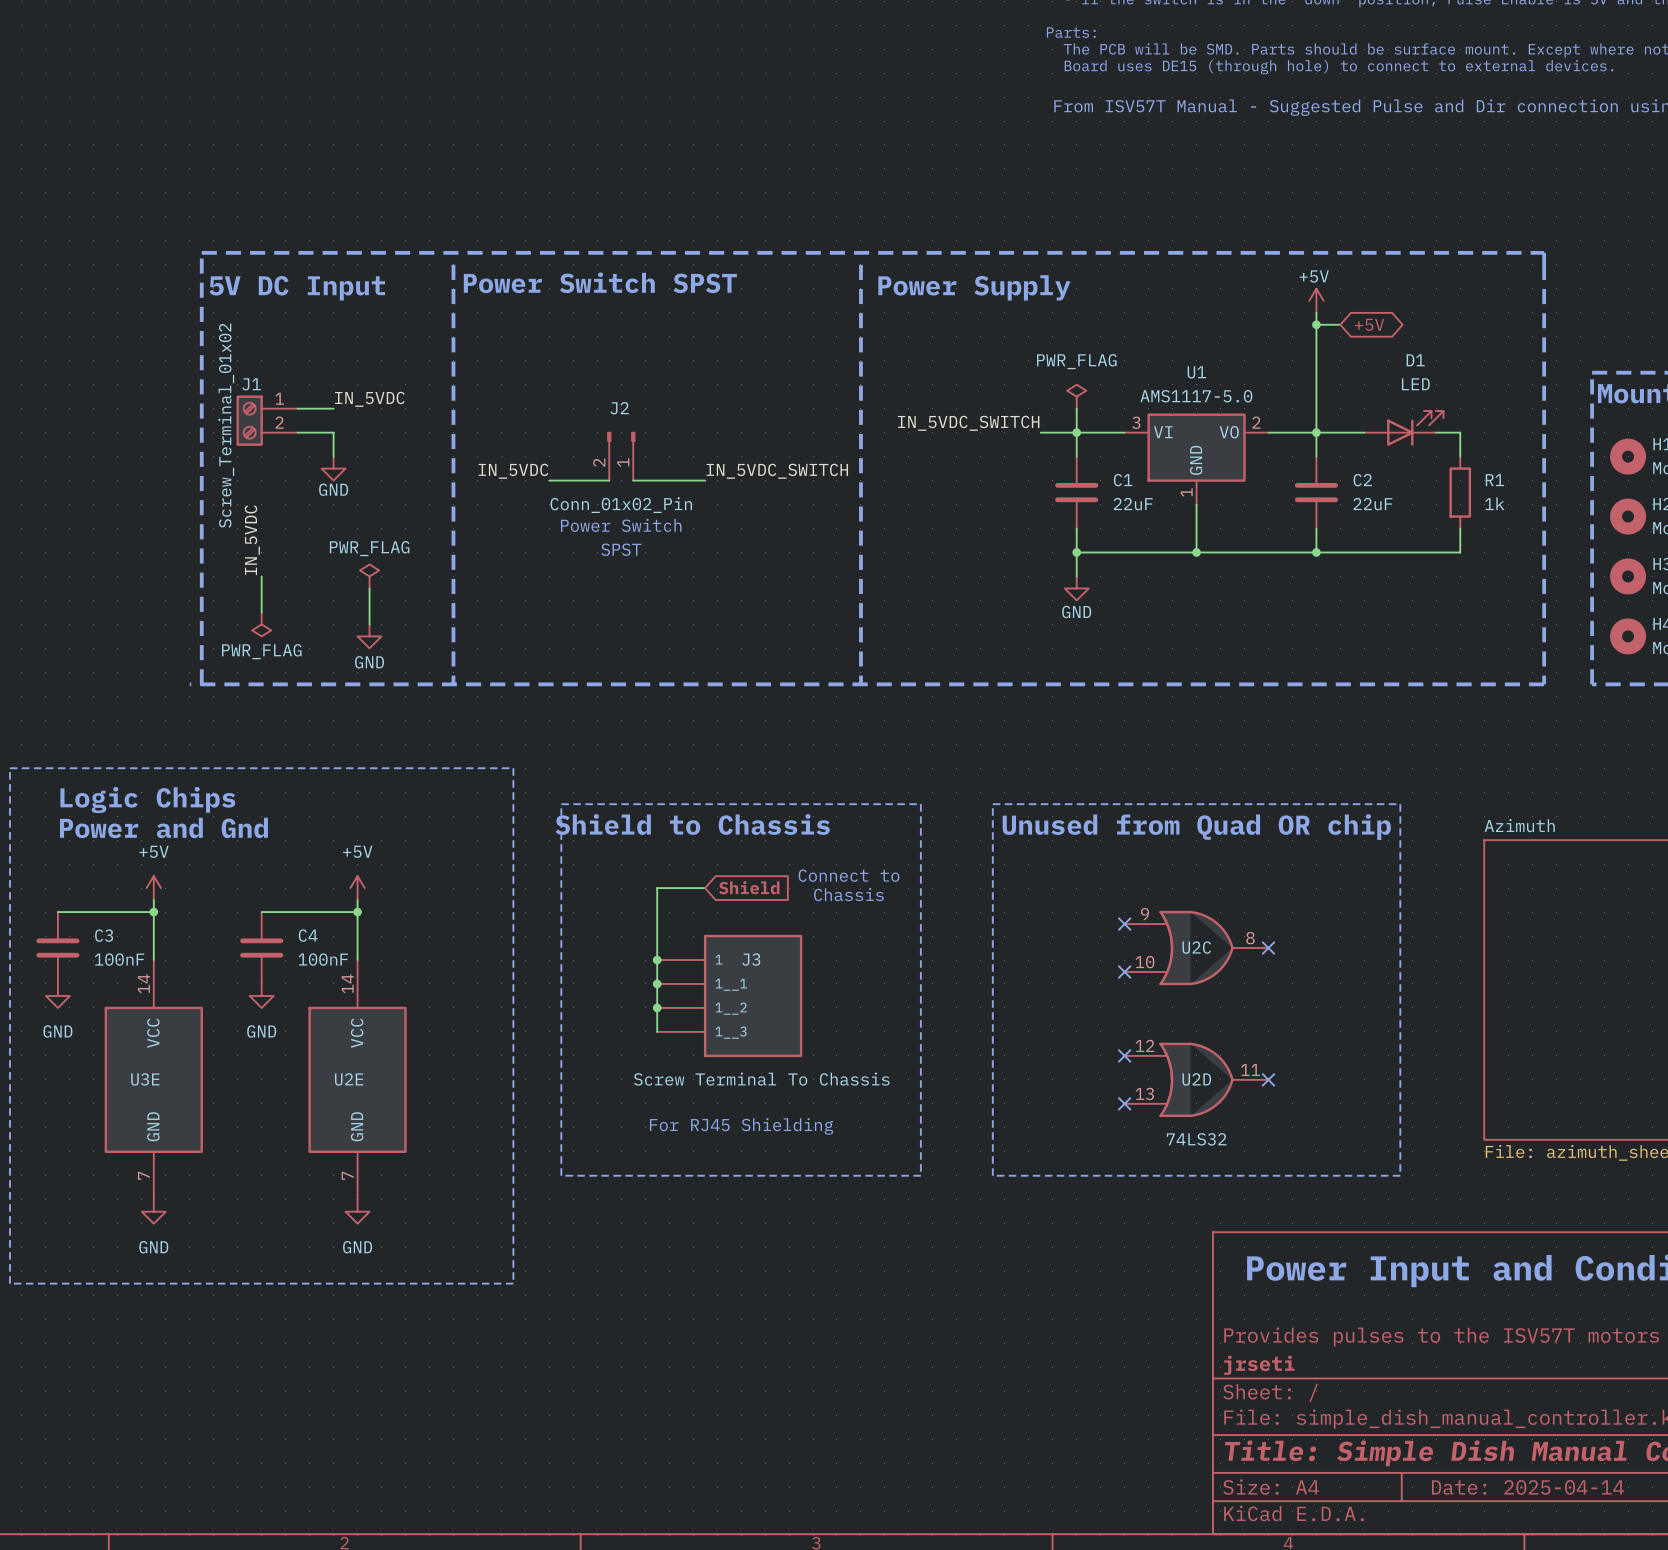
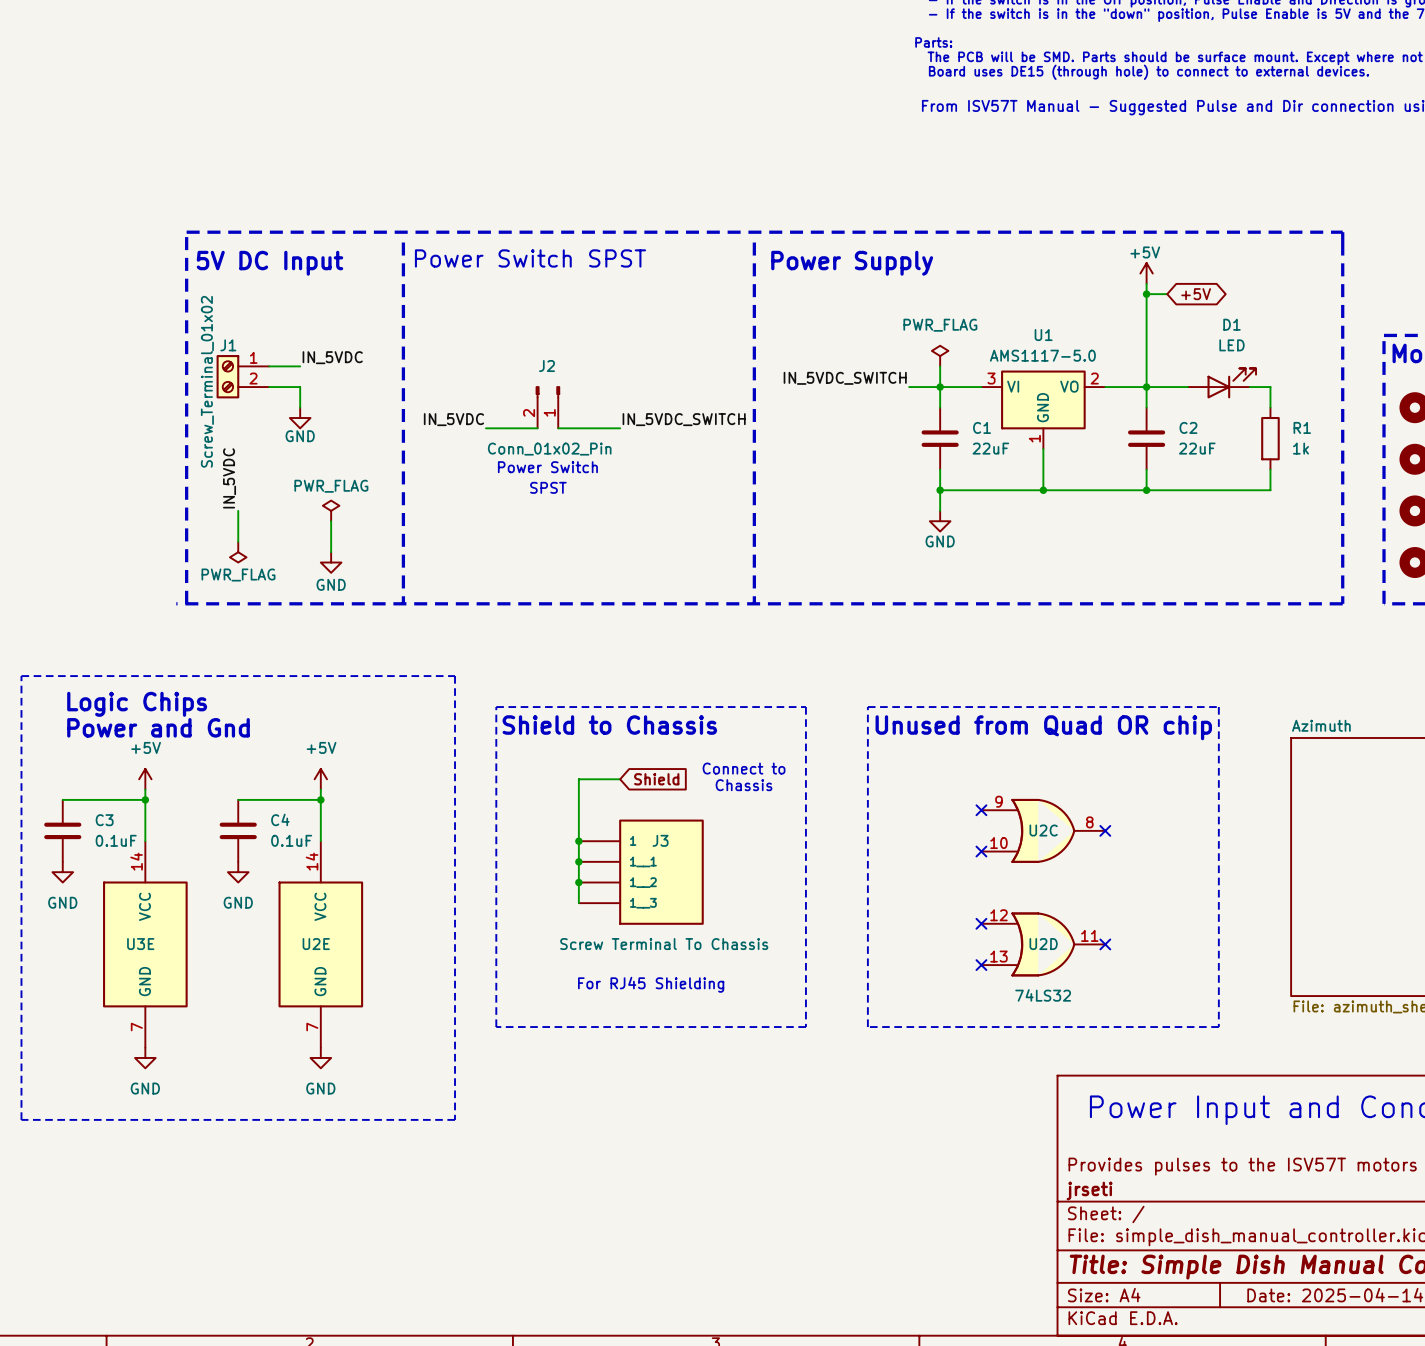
C3 value: 100nF (119, 959) -> 0.1uF (116, 840)
C4 value: 100nF (323, 959) -> 0.1uF (291, 840)

